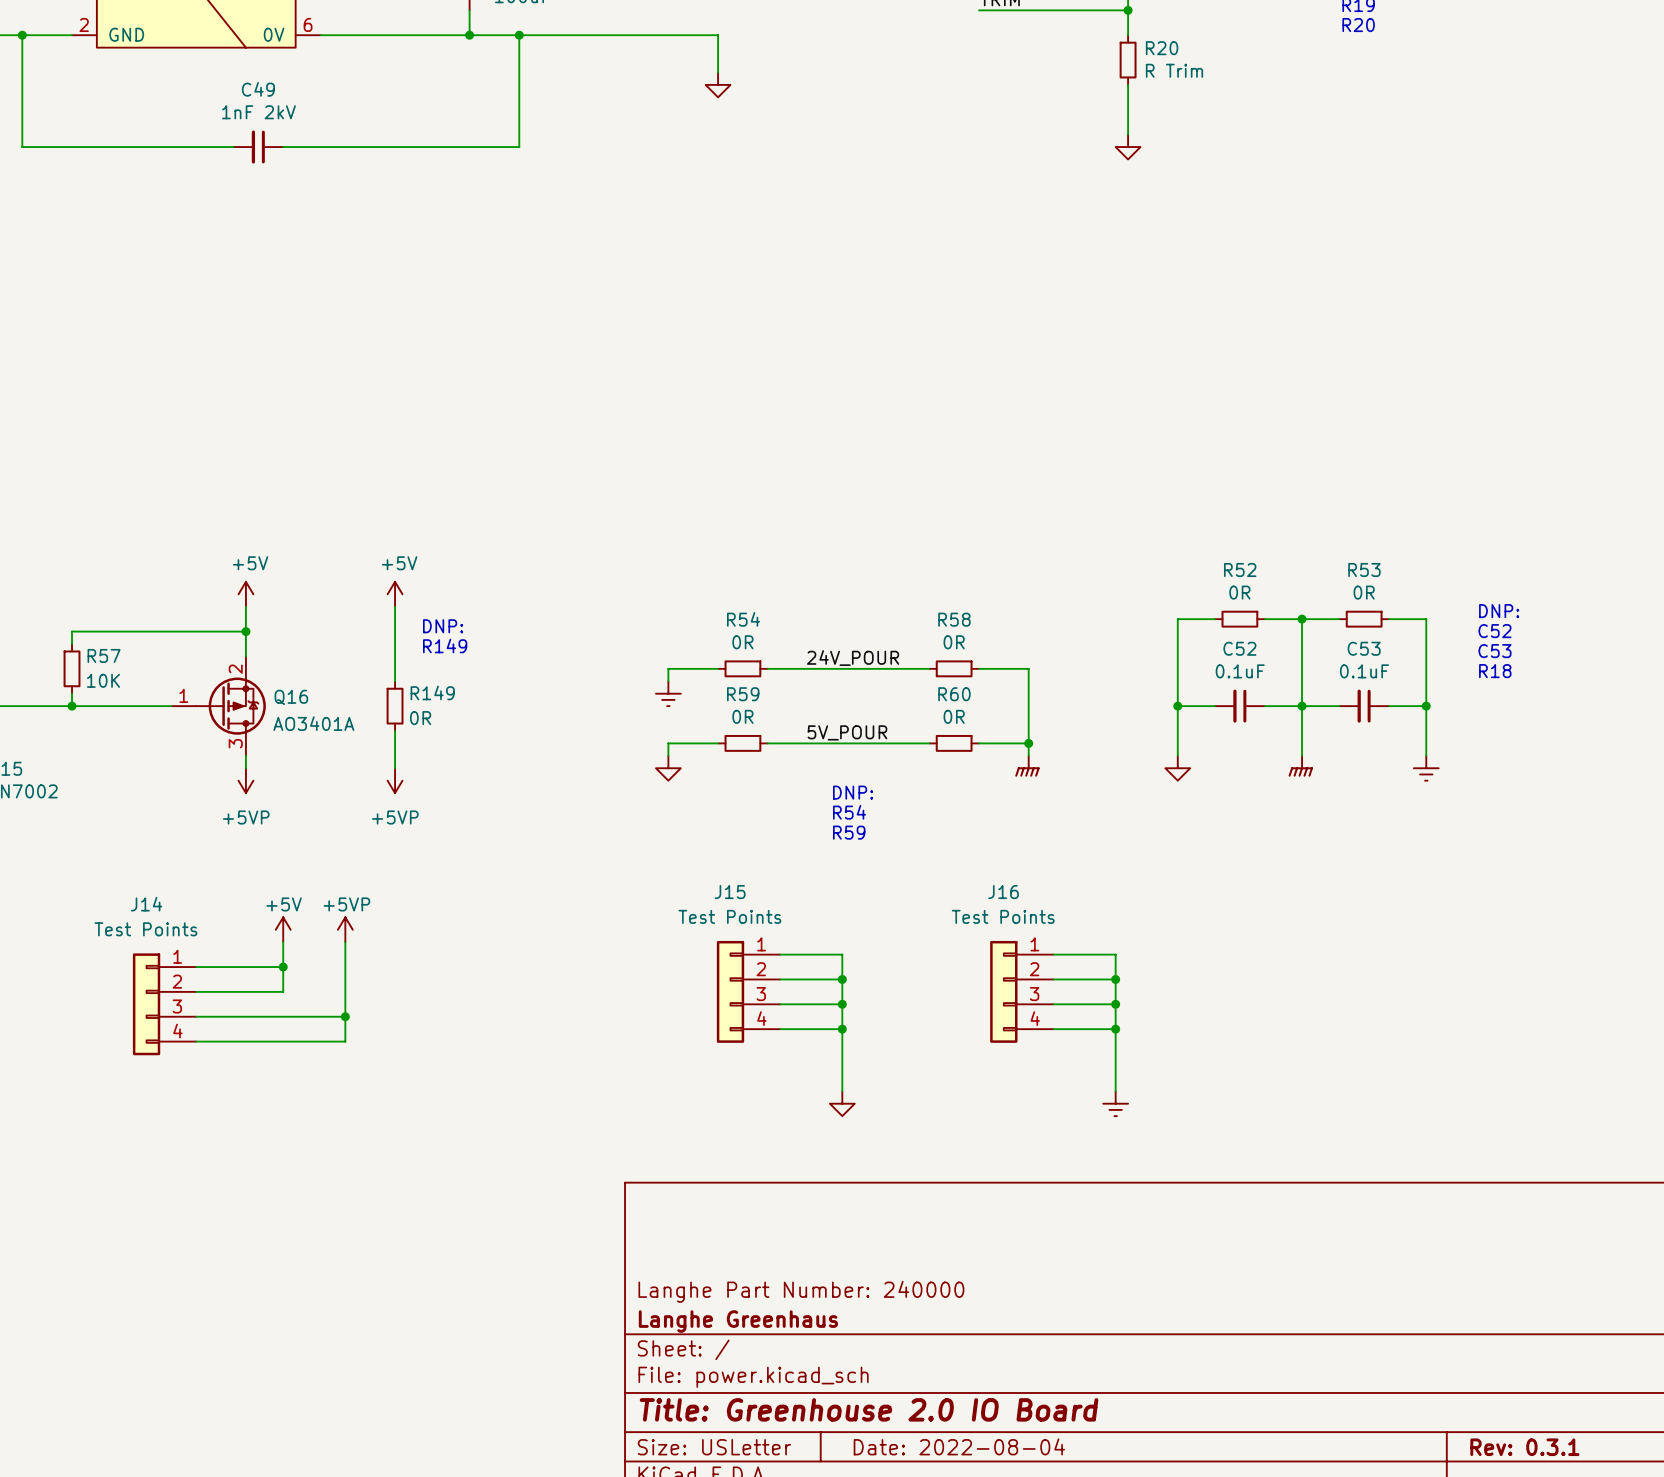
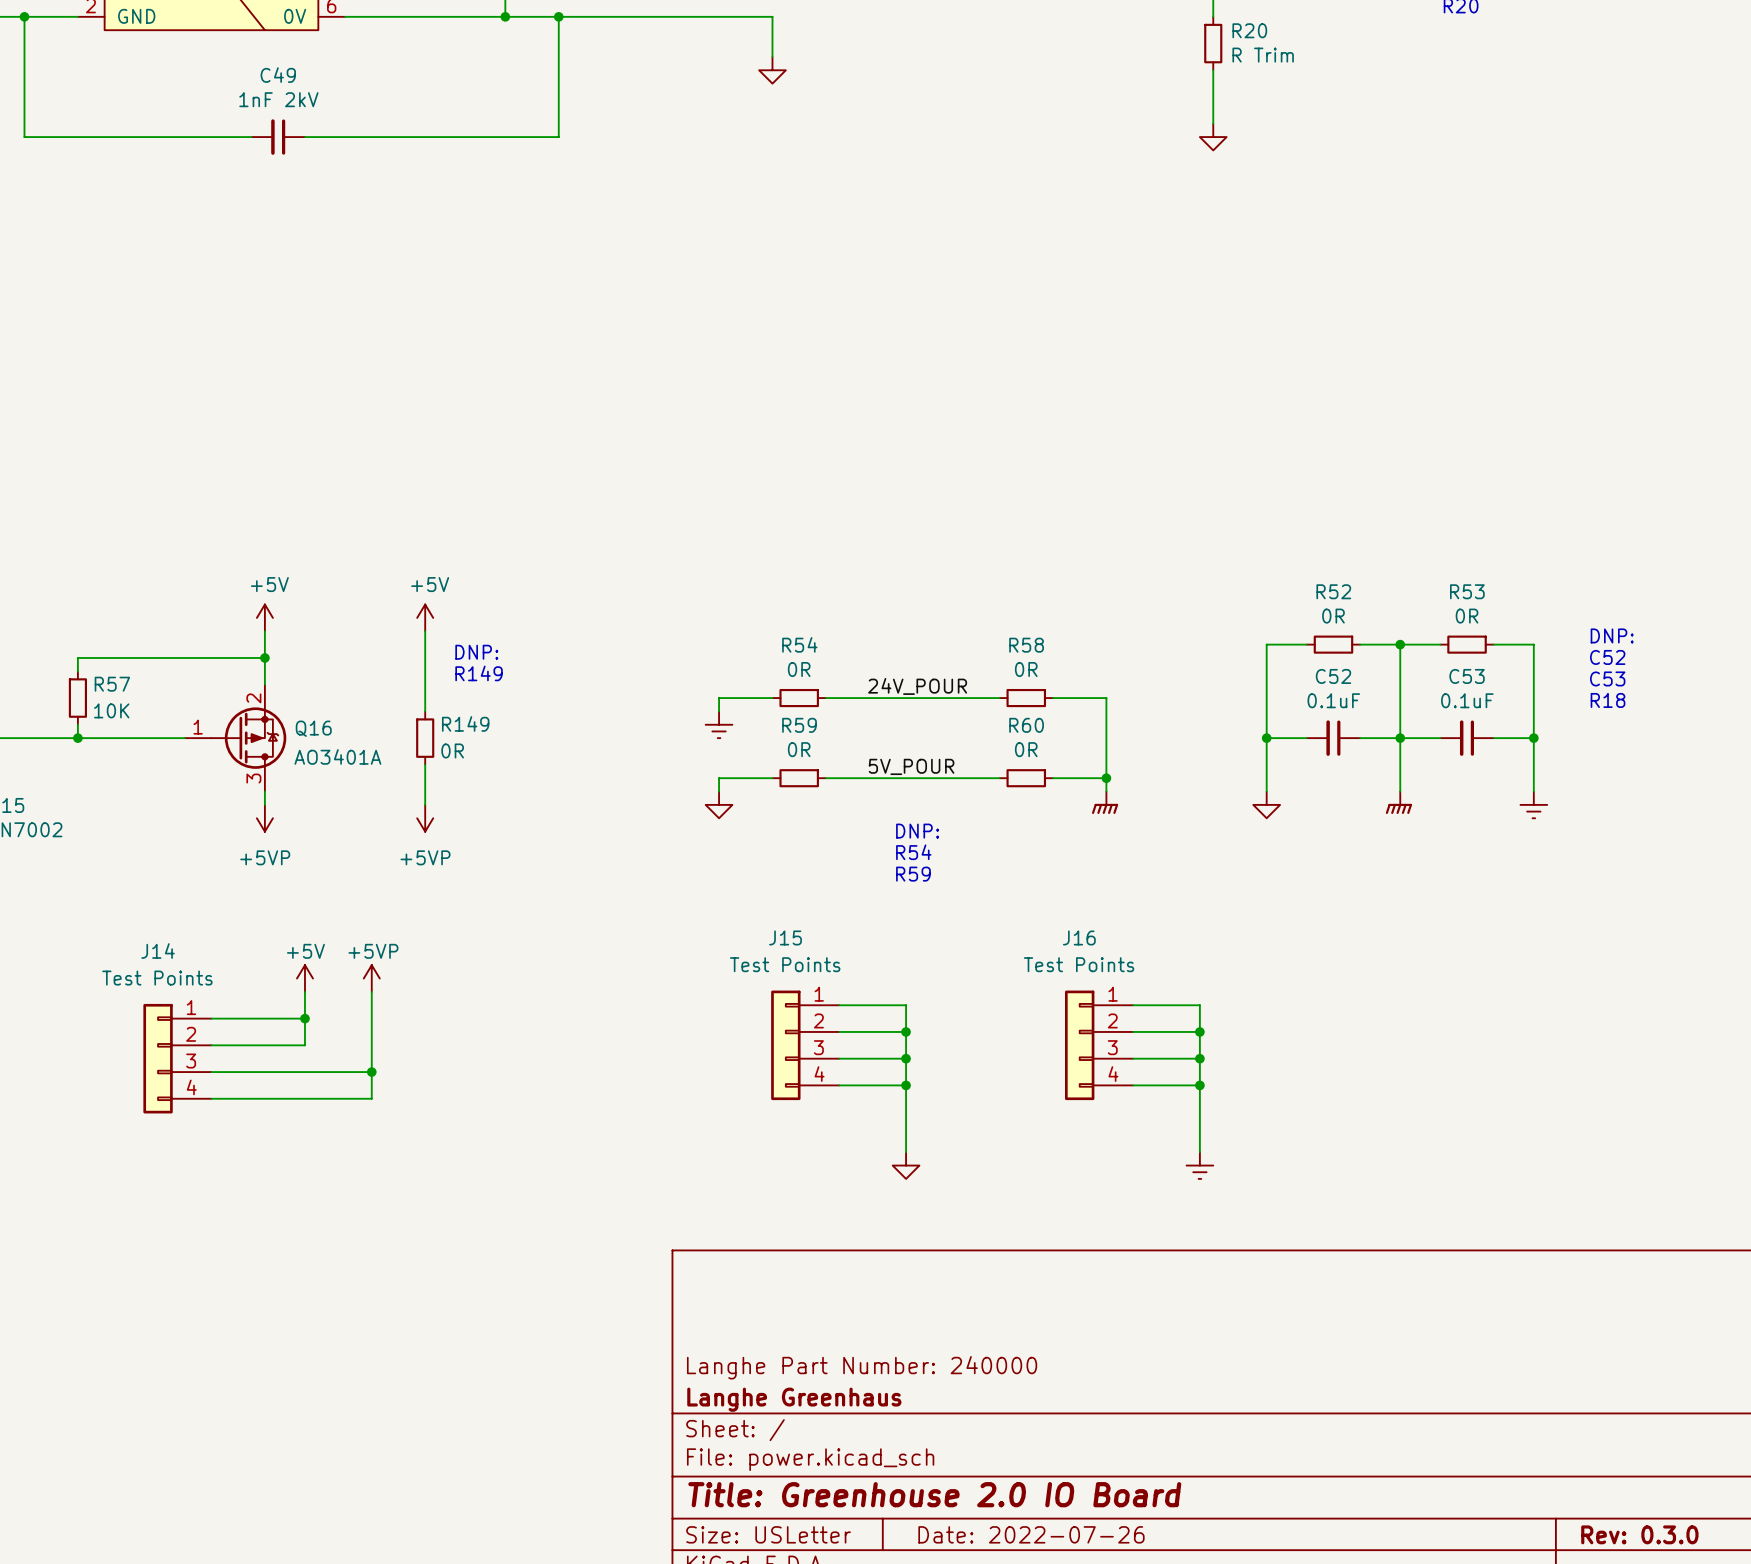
title block: Date: 2022-08-04 (959, 1446) -> Date: 2022-07-26 (1031, 1534)
title block: Rev: 0.3.1 (1524, 1447) -> Rev: 0.3.0 (1639, 1534)

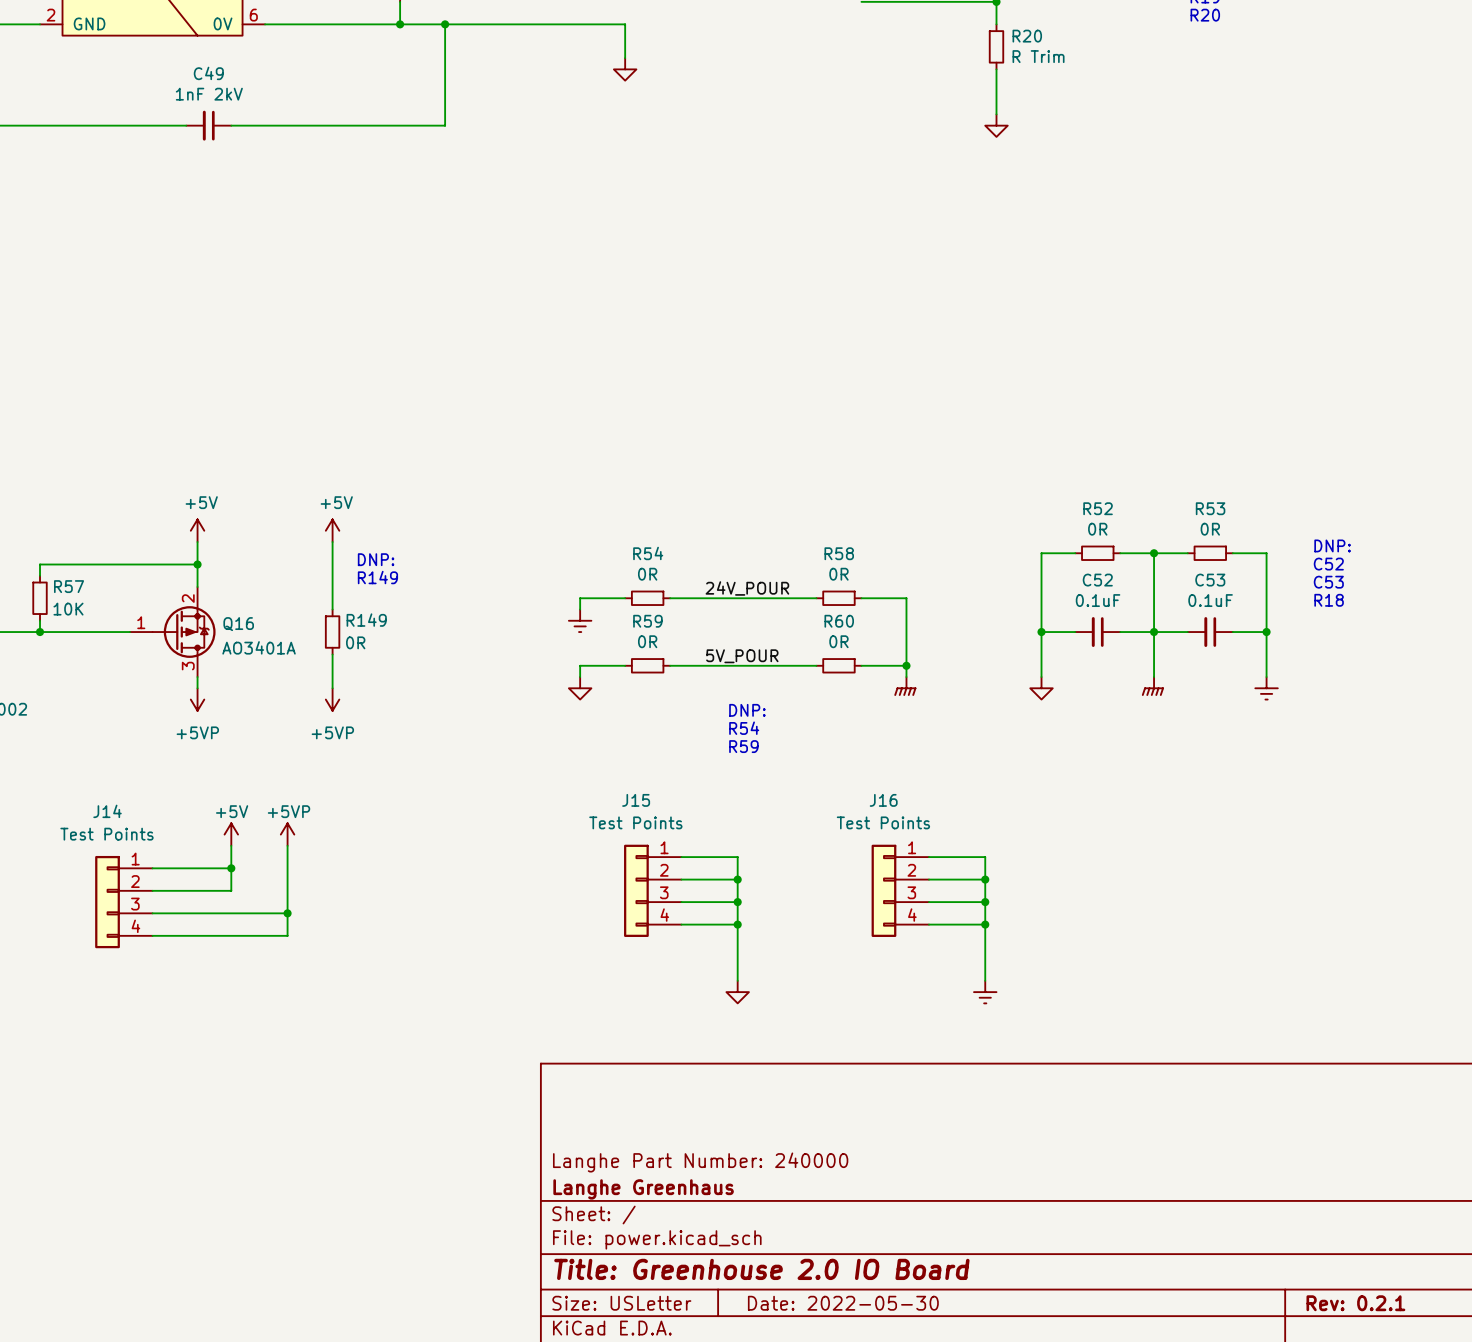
title block: Date: 2022-07-26 (1031, 1534) -> Date: 2022-05-30 (843, 1303)
title block: Rev: 0.3.0 (1639, 1534) -> Rev: 0.2.1 (1355, 1303)

